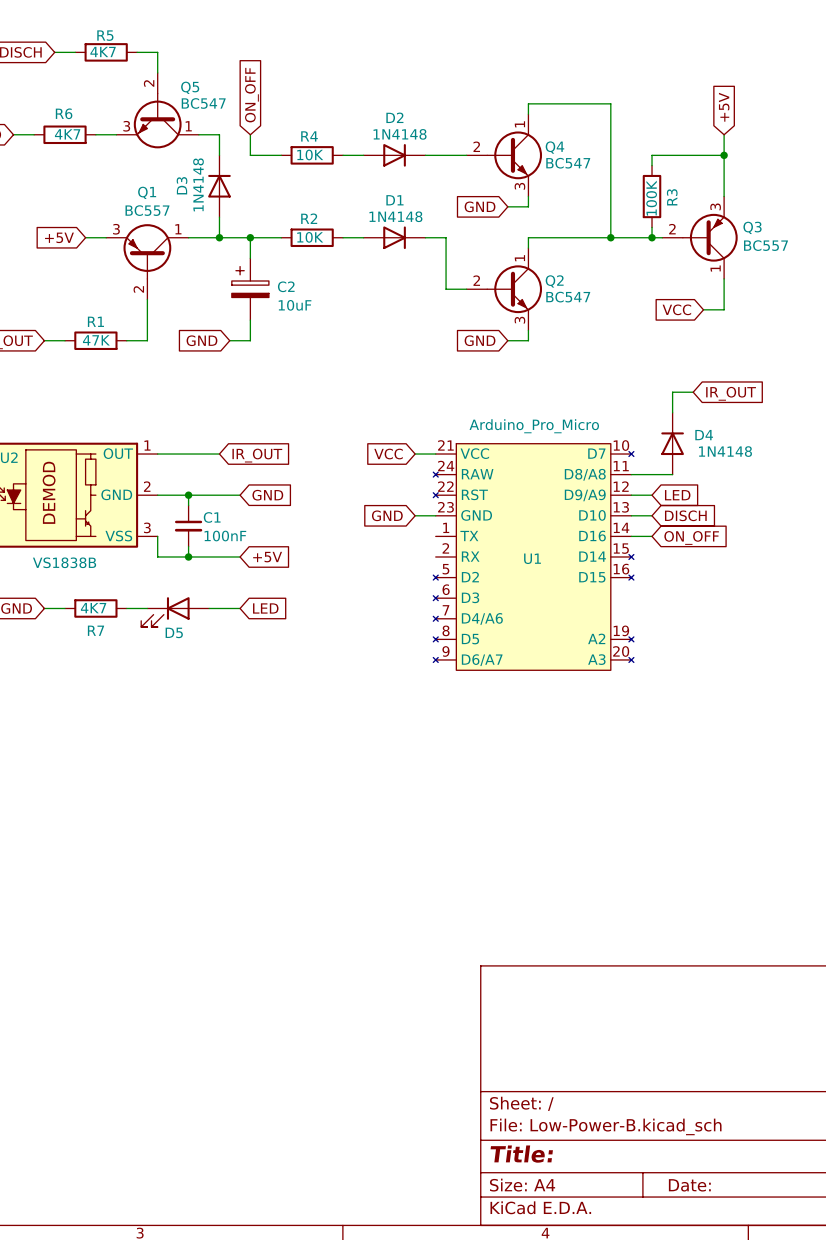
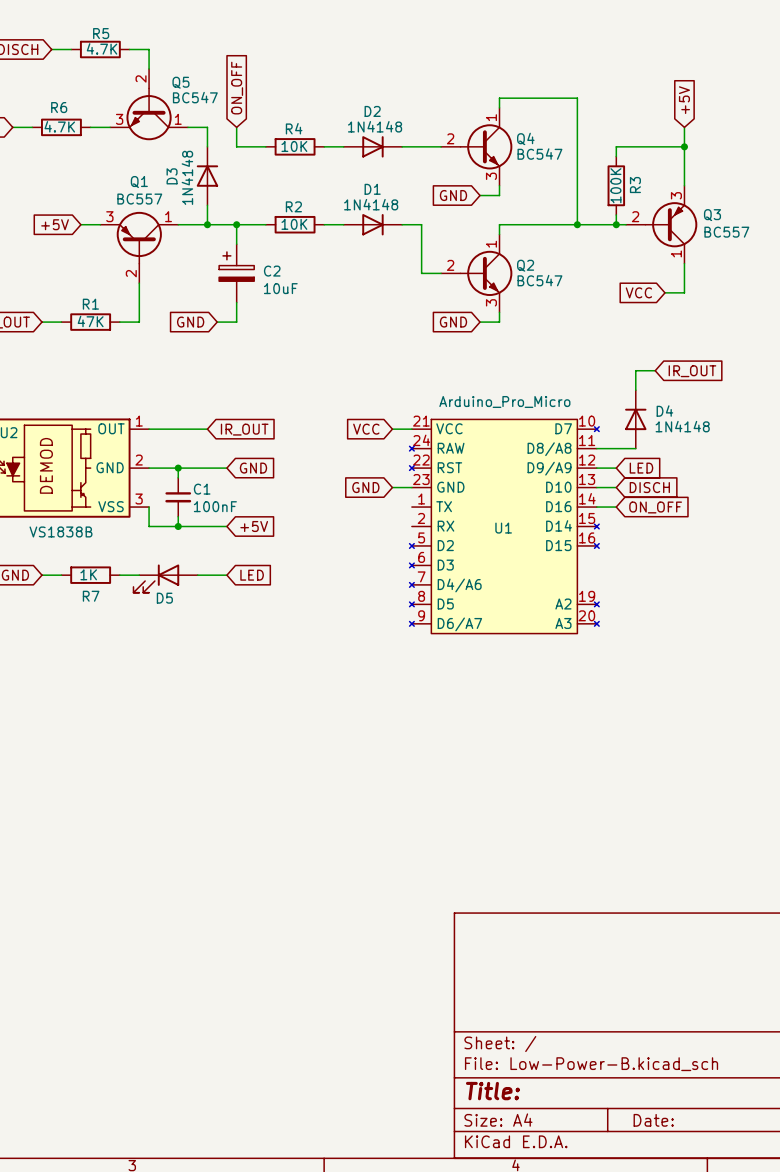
R5 value: 4K7 (103, 51) -> 4.7K (102, 48)
R6 value: 4K7 (67, 134) -> 4.7K (59, 126)
R7 value: 4K7 (93, 608) -> 1K (88, 574)

